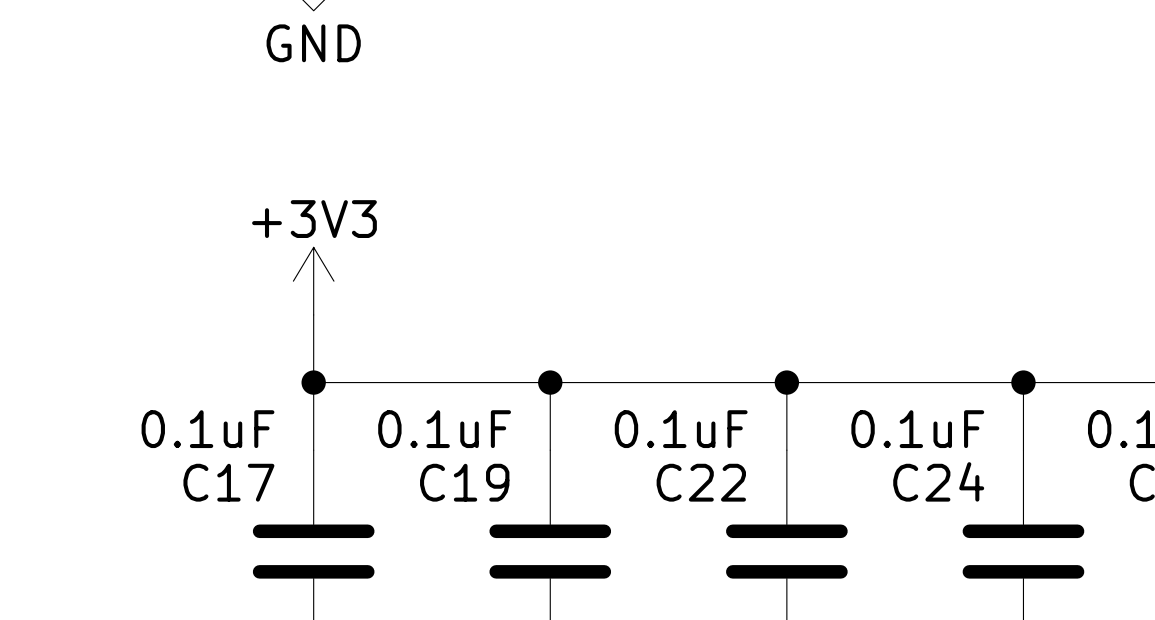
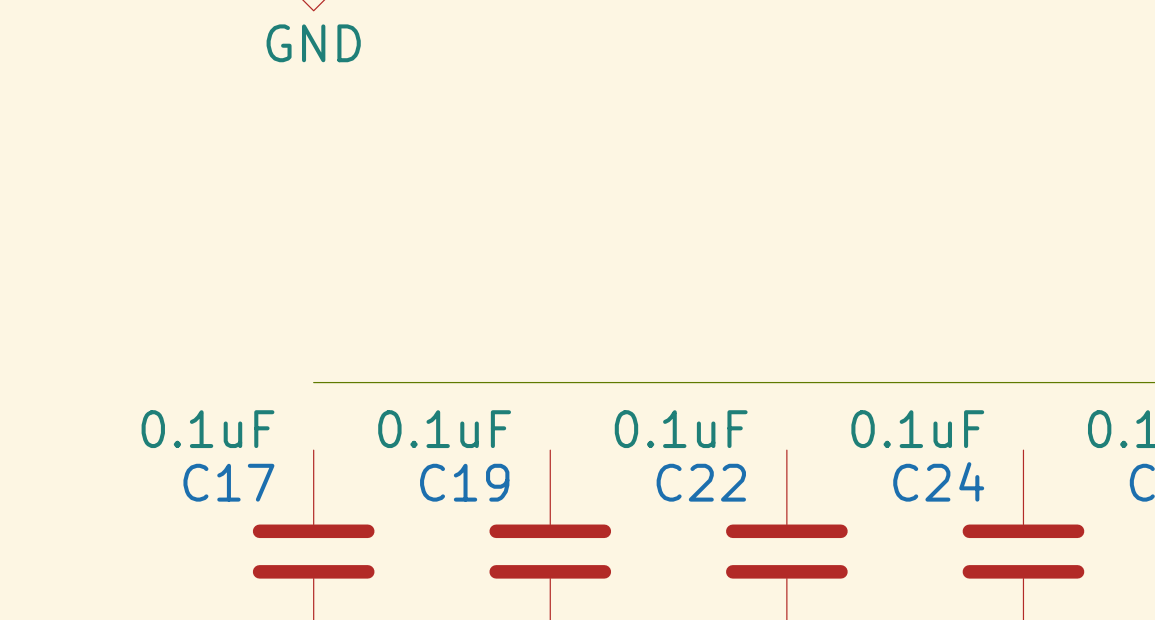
power symbol: +3V3 (313, 281) -> none
wire: (313, 314) (313, 450) -> none
junction: (313, 382) -> none
wire: (550, 382) (550, 450) -> none
junction: (550, 382) -> none
wire: (786, 382) (786, 450) -> none
junction: (786, 382) -> none
wire: (1023, 382) (1023, 450) -> none
junction: (1023, 382) -> none

